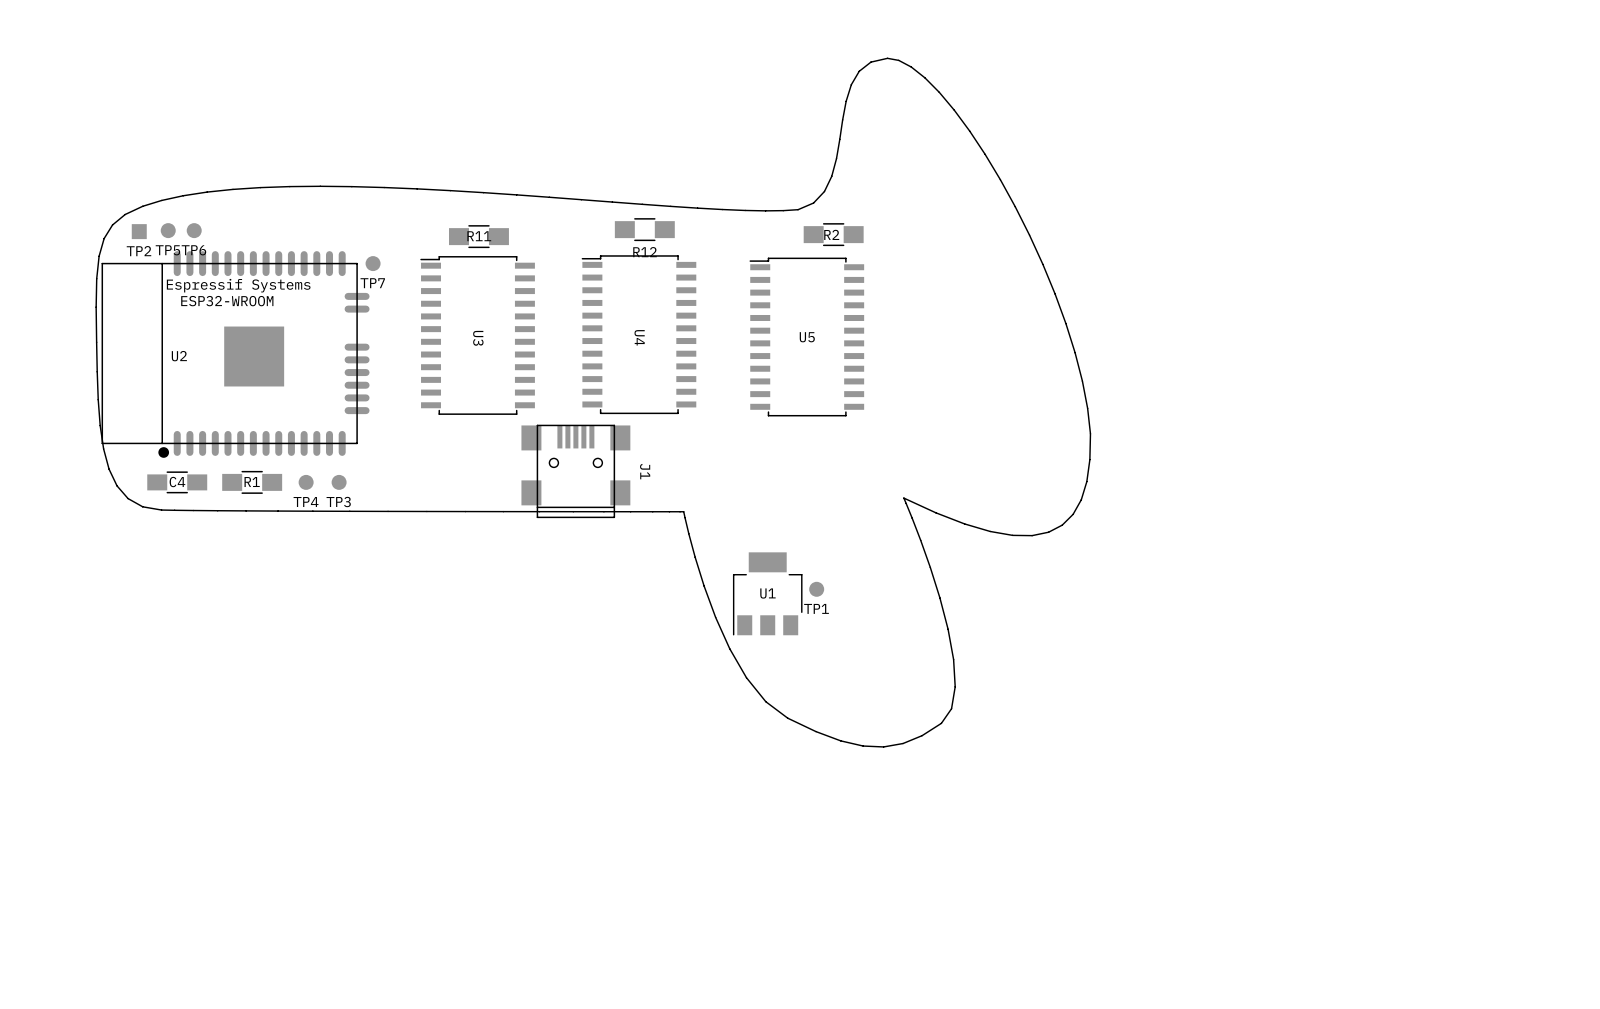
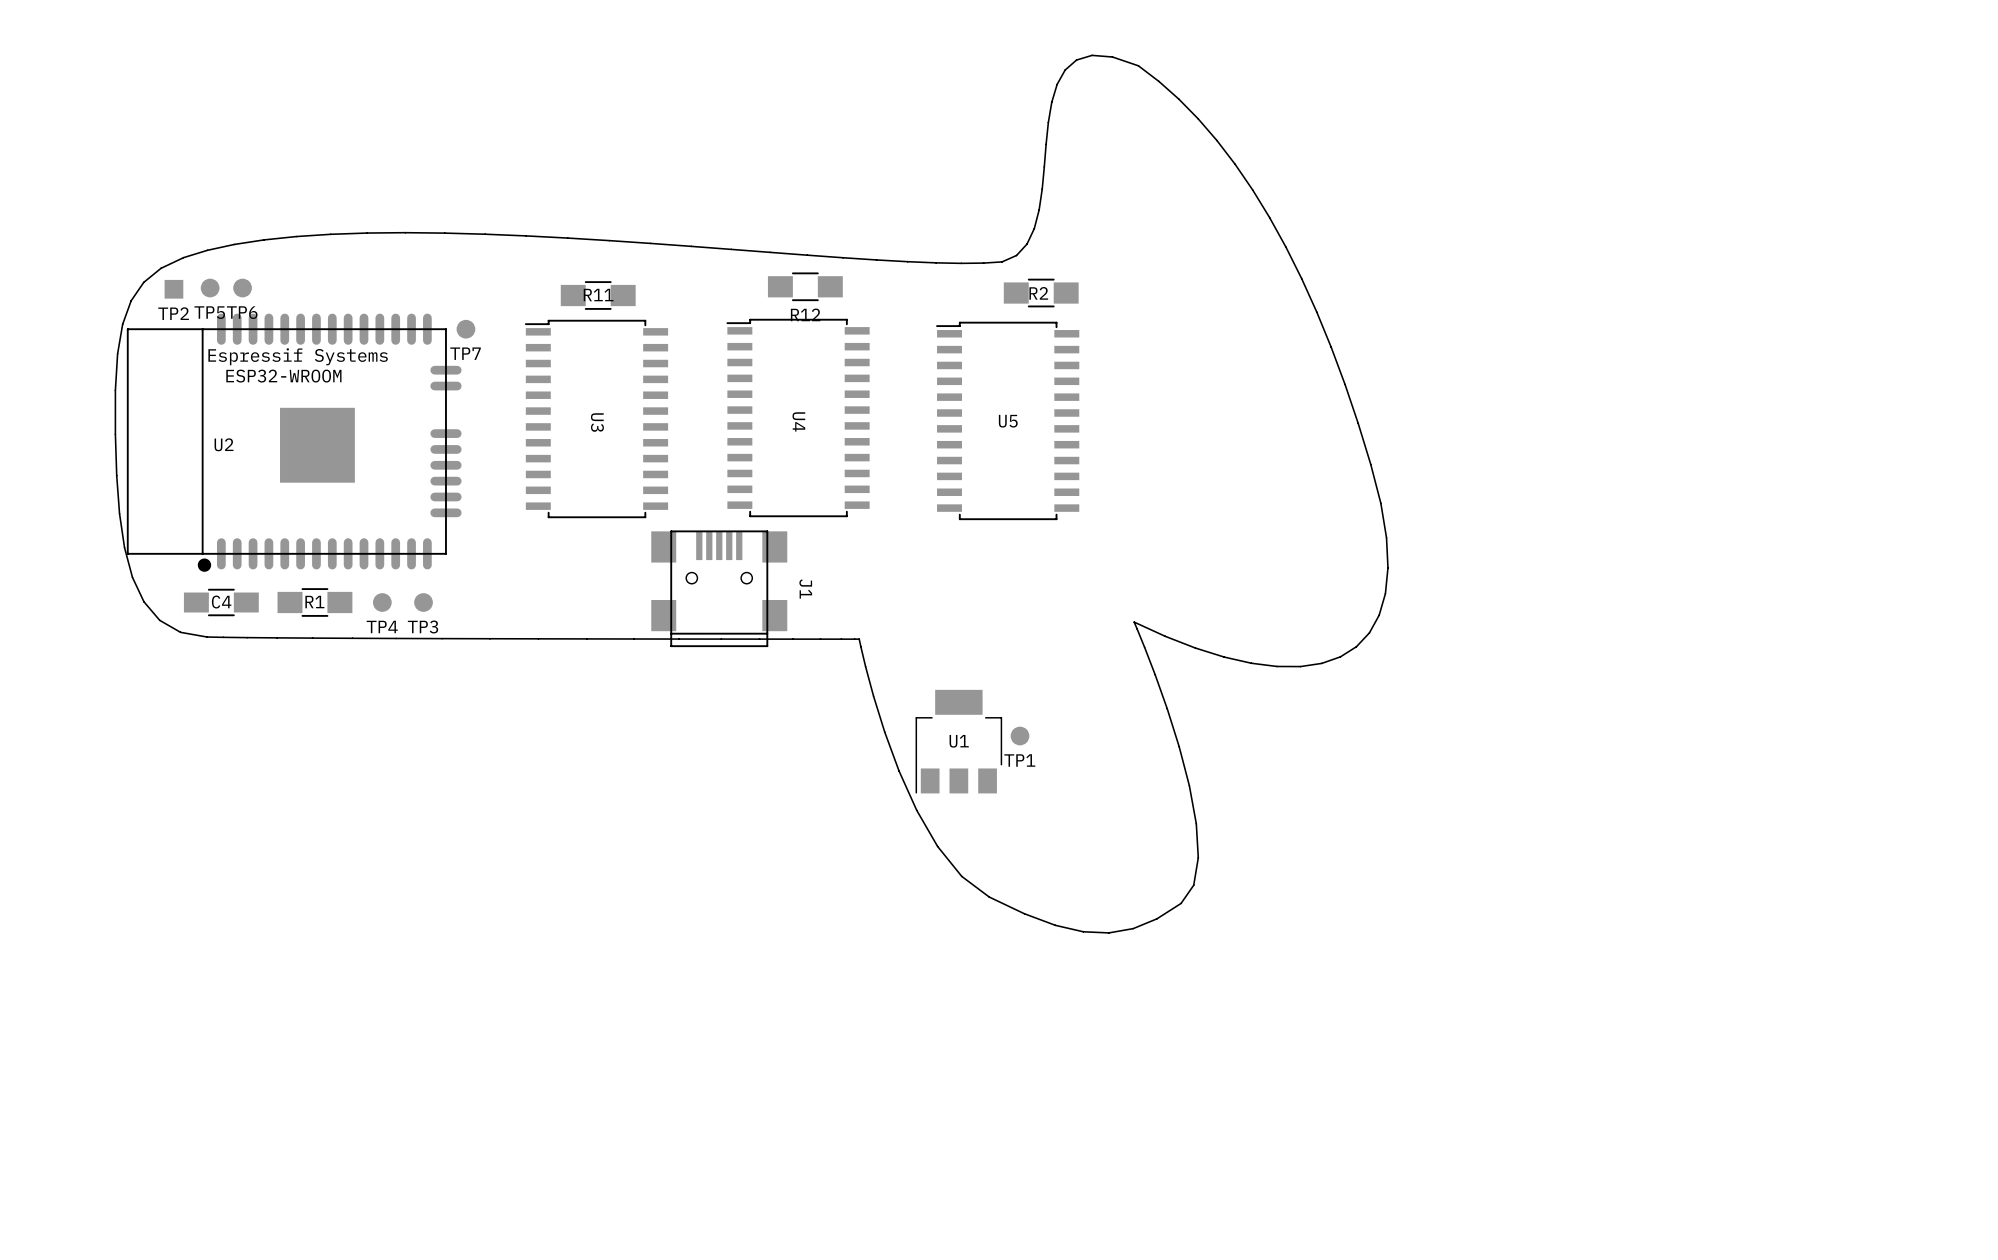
drawing: none -> [114, 54, 1389, 934]
drawing: [95, 57, 1092, 748] -> none

